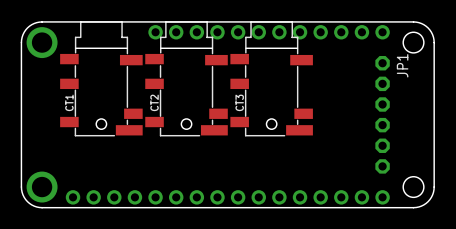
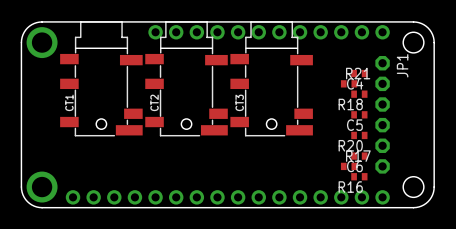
C4: none -> (359, 73)
R21: none -> (349, 83)
R18: none -> (359, 94)
C5: none -> (359, 114)
R20: none -> (359, 135)
C6: none -> (359, 156)
R17: none -> (349, 166)
R16: none -> (359, 176)

